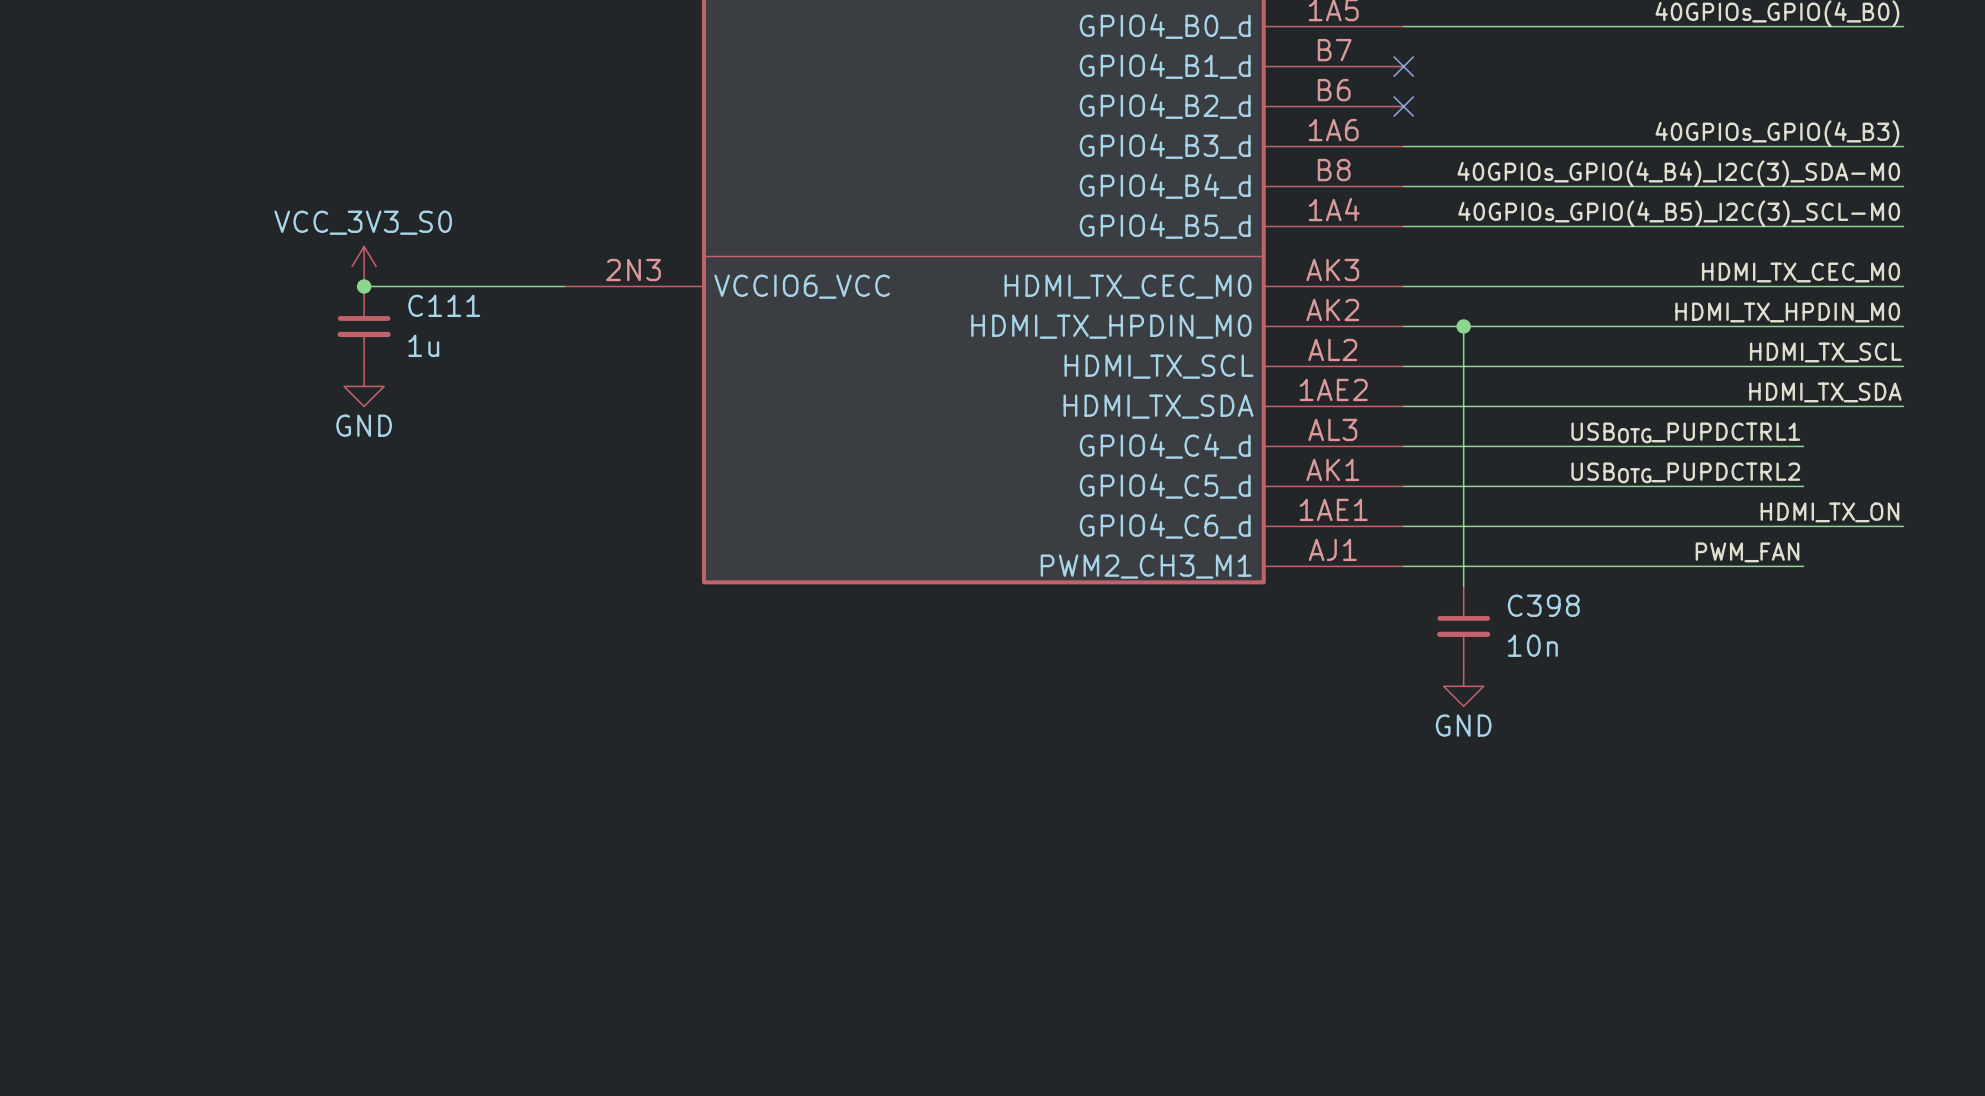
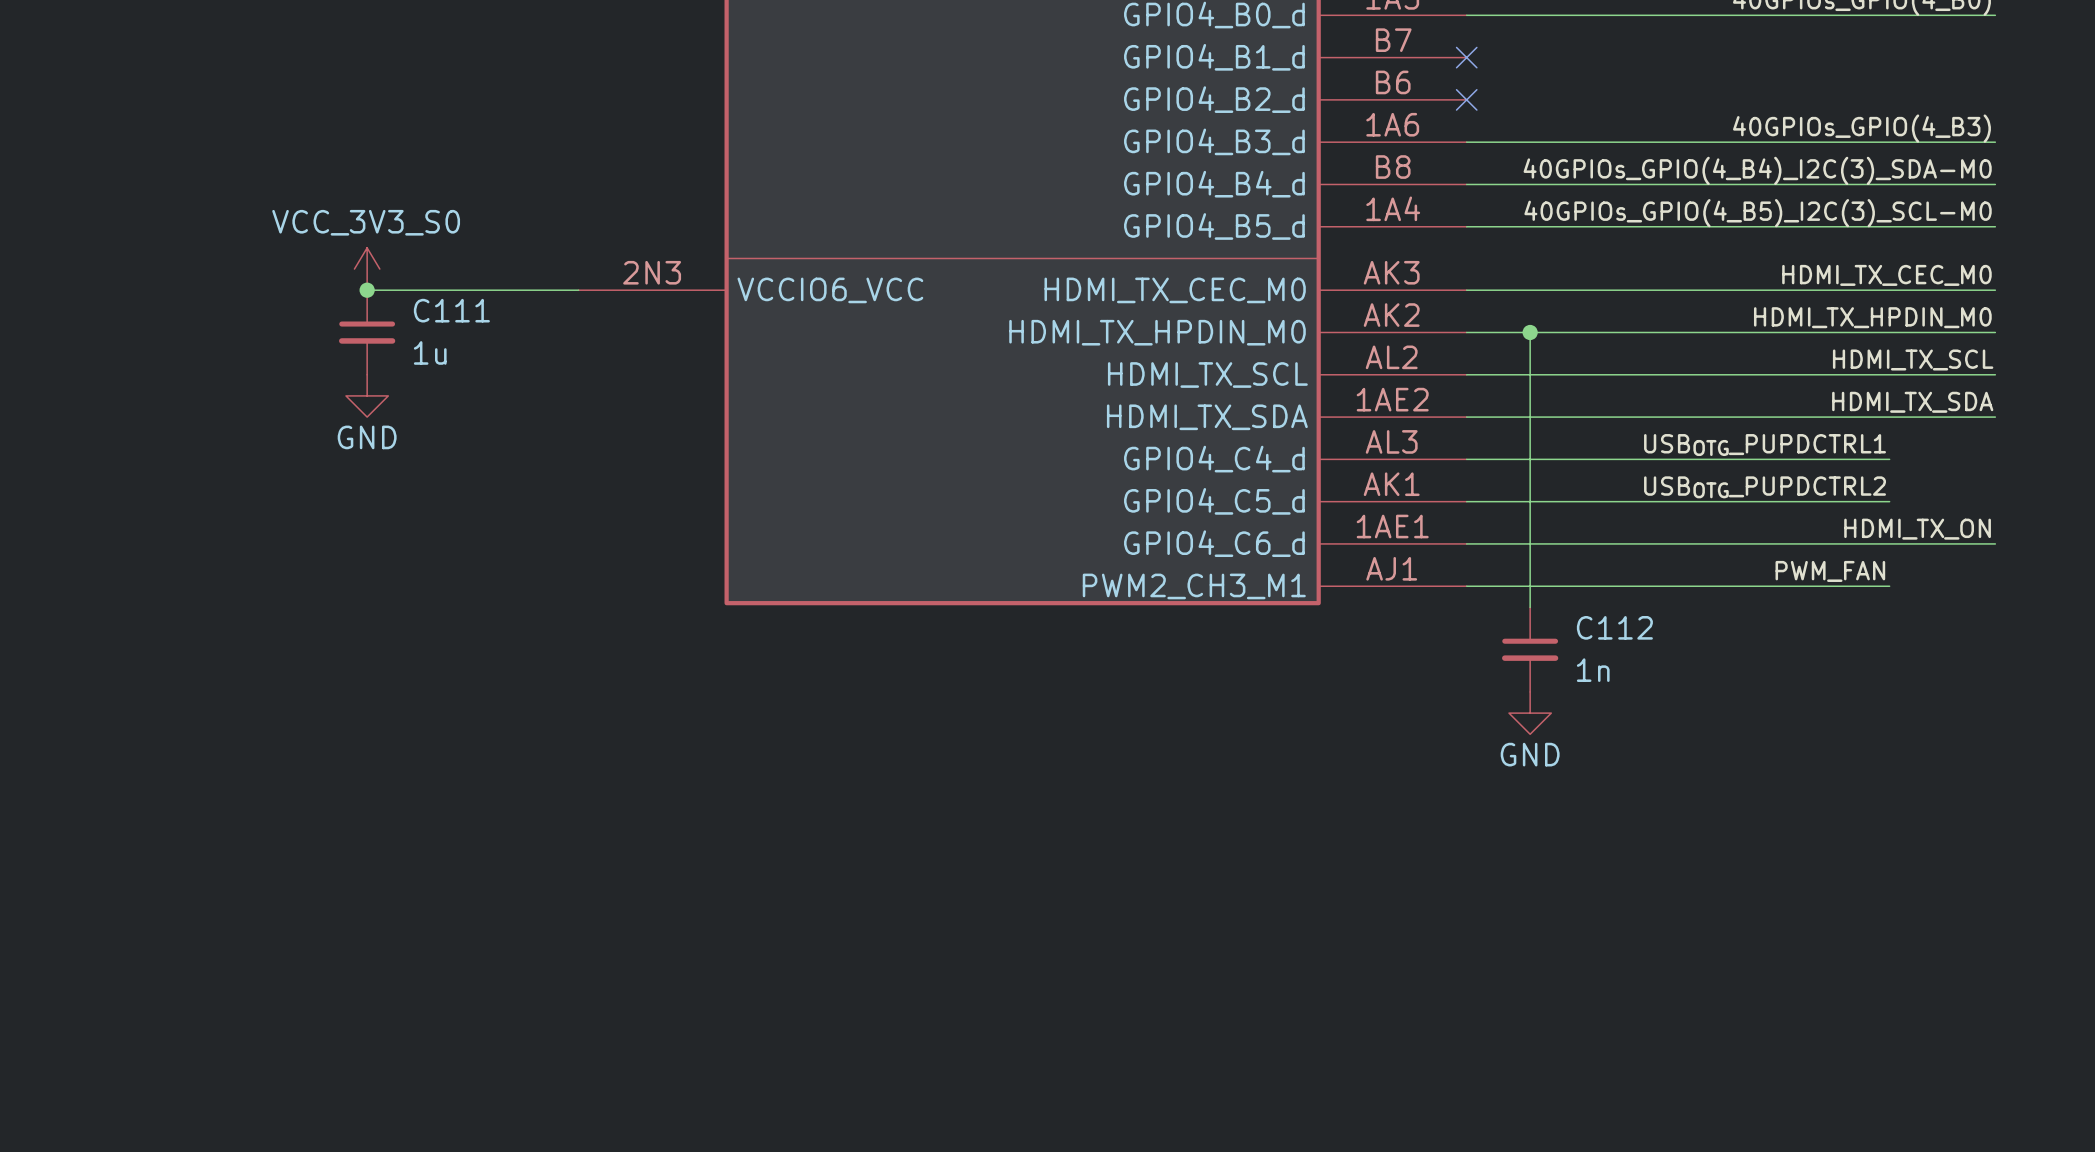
C398 name: C398 (1543, 605) -> C112 (1614, 627)
C398 value: 10n (1532, 645) -> 1n (1593, 670)

